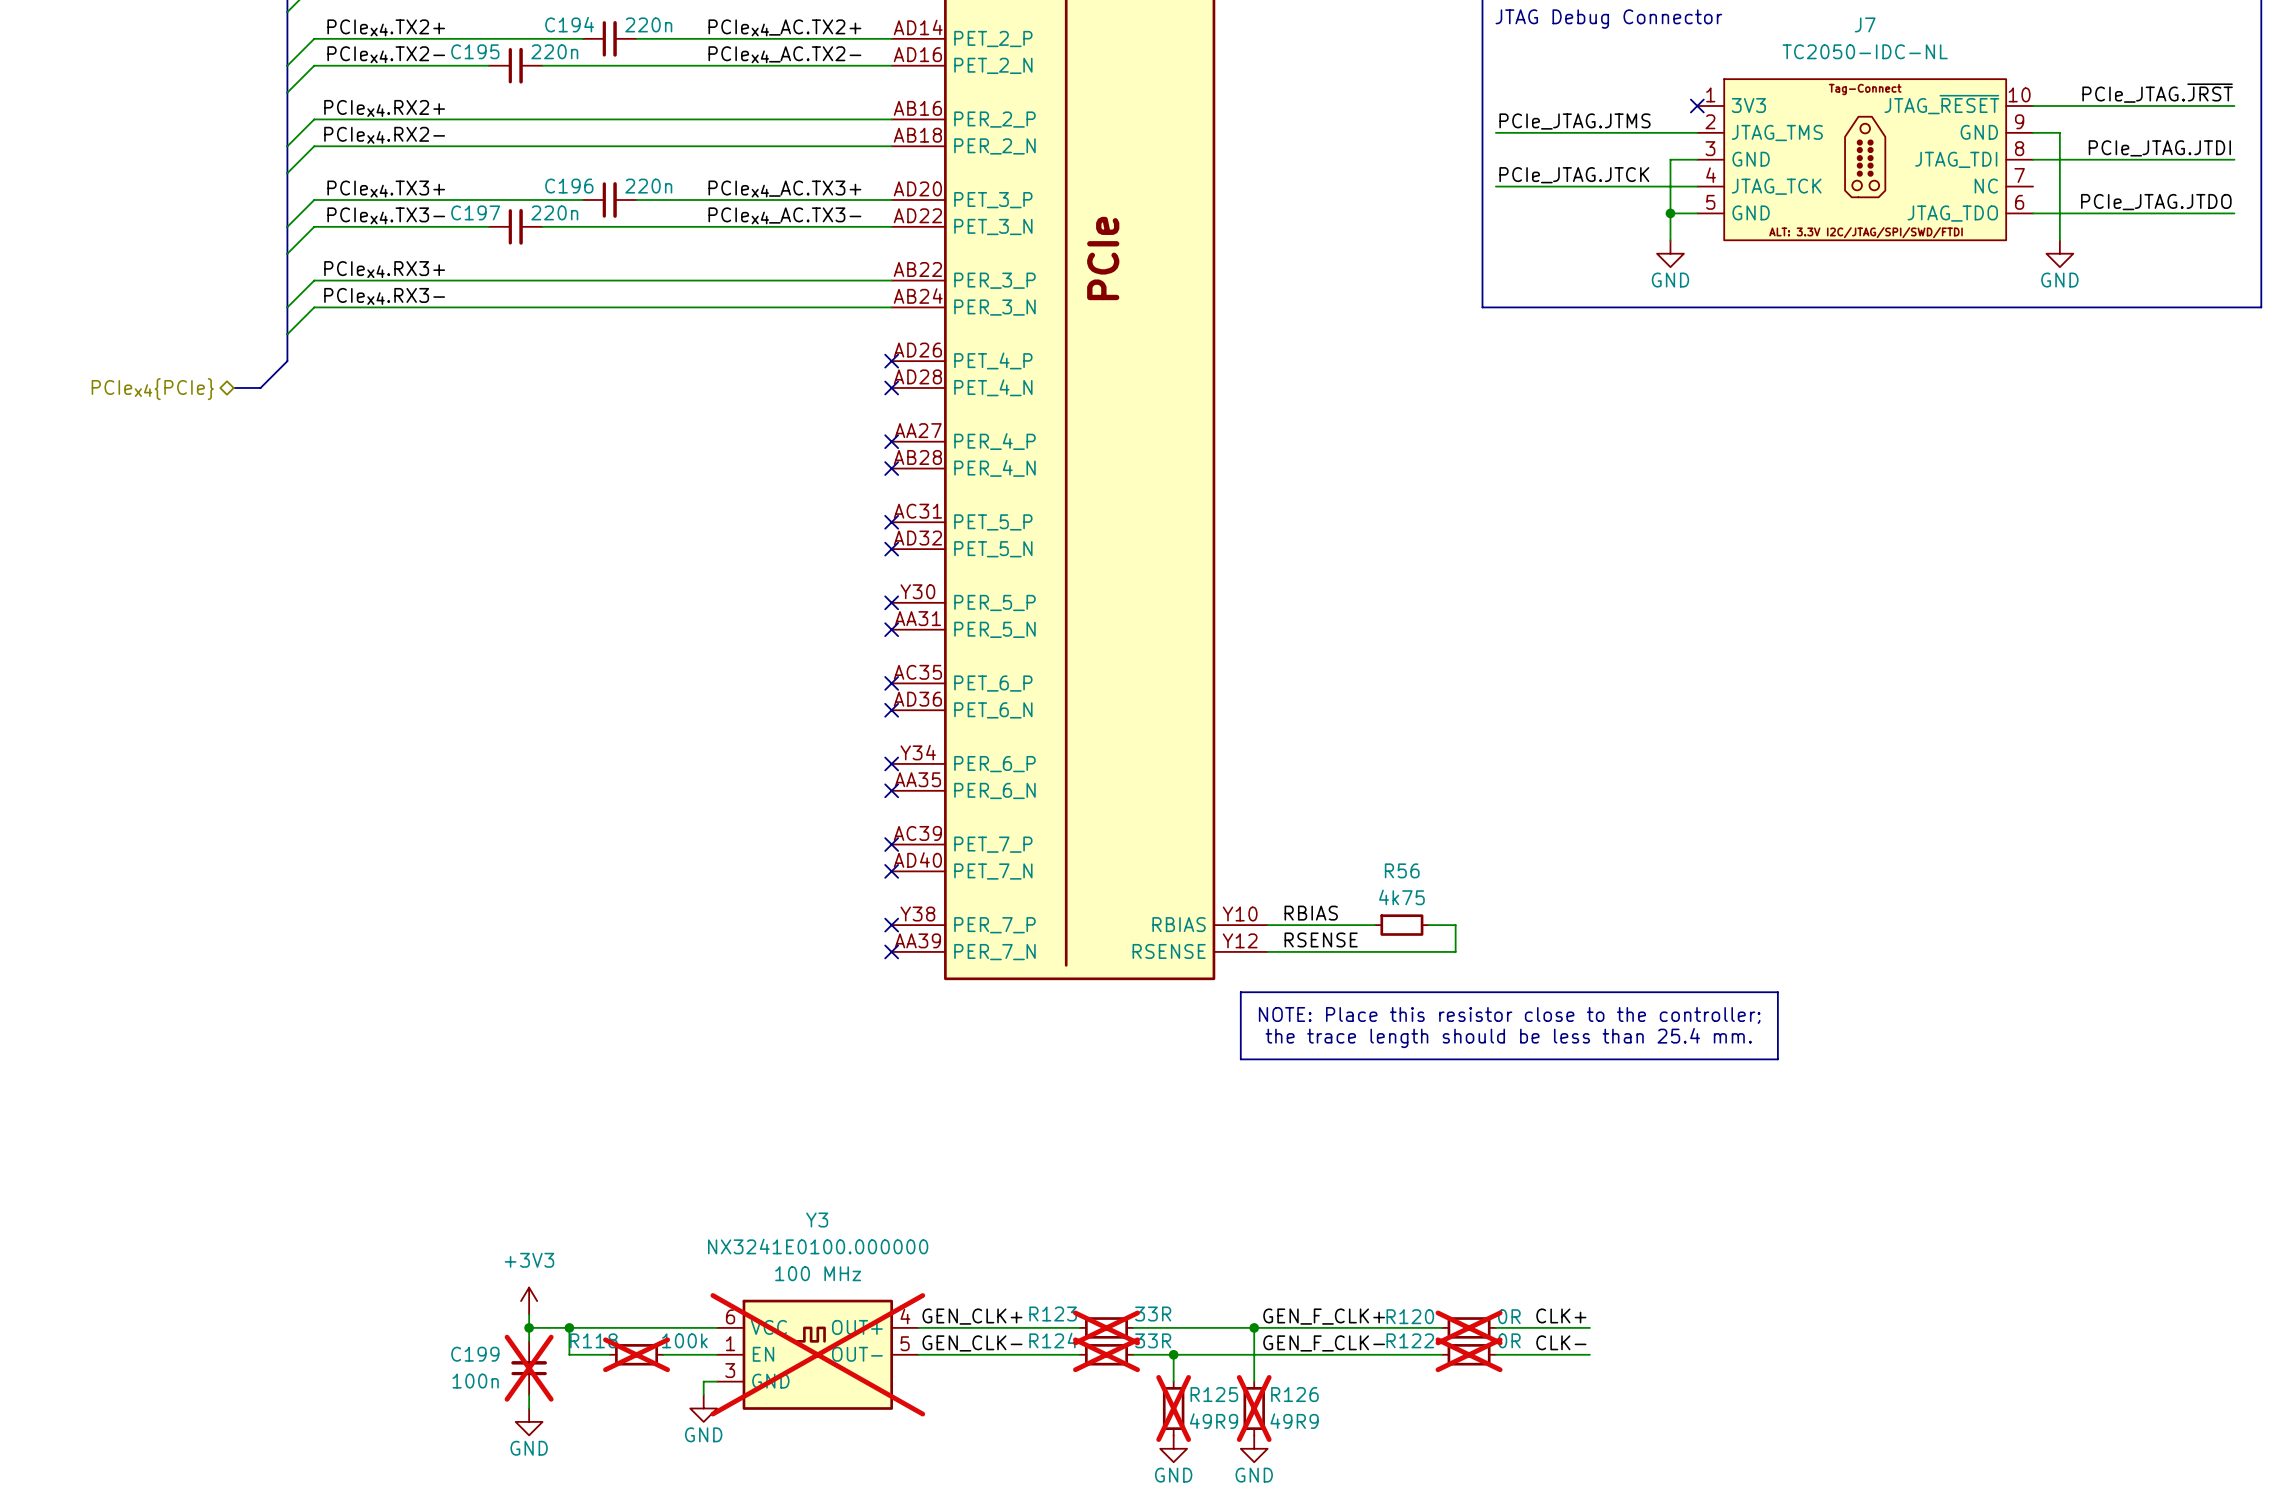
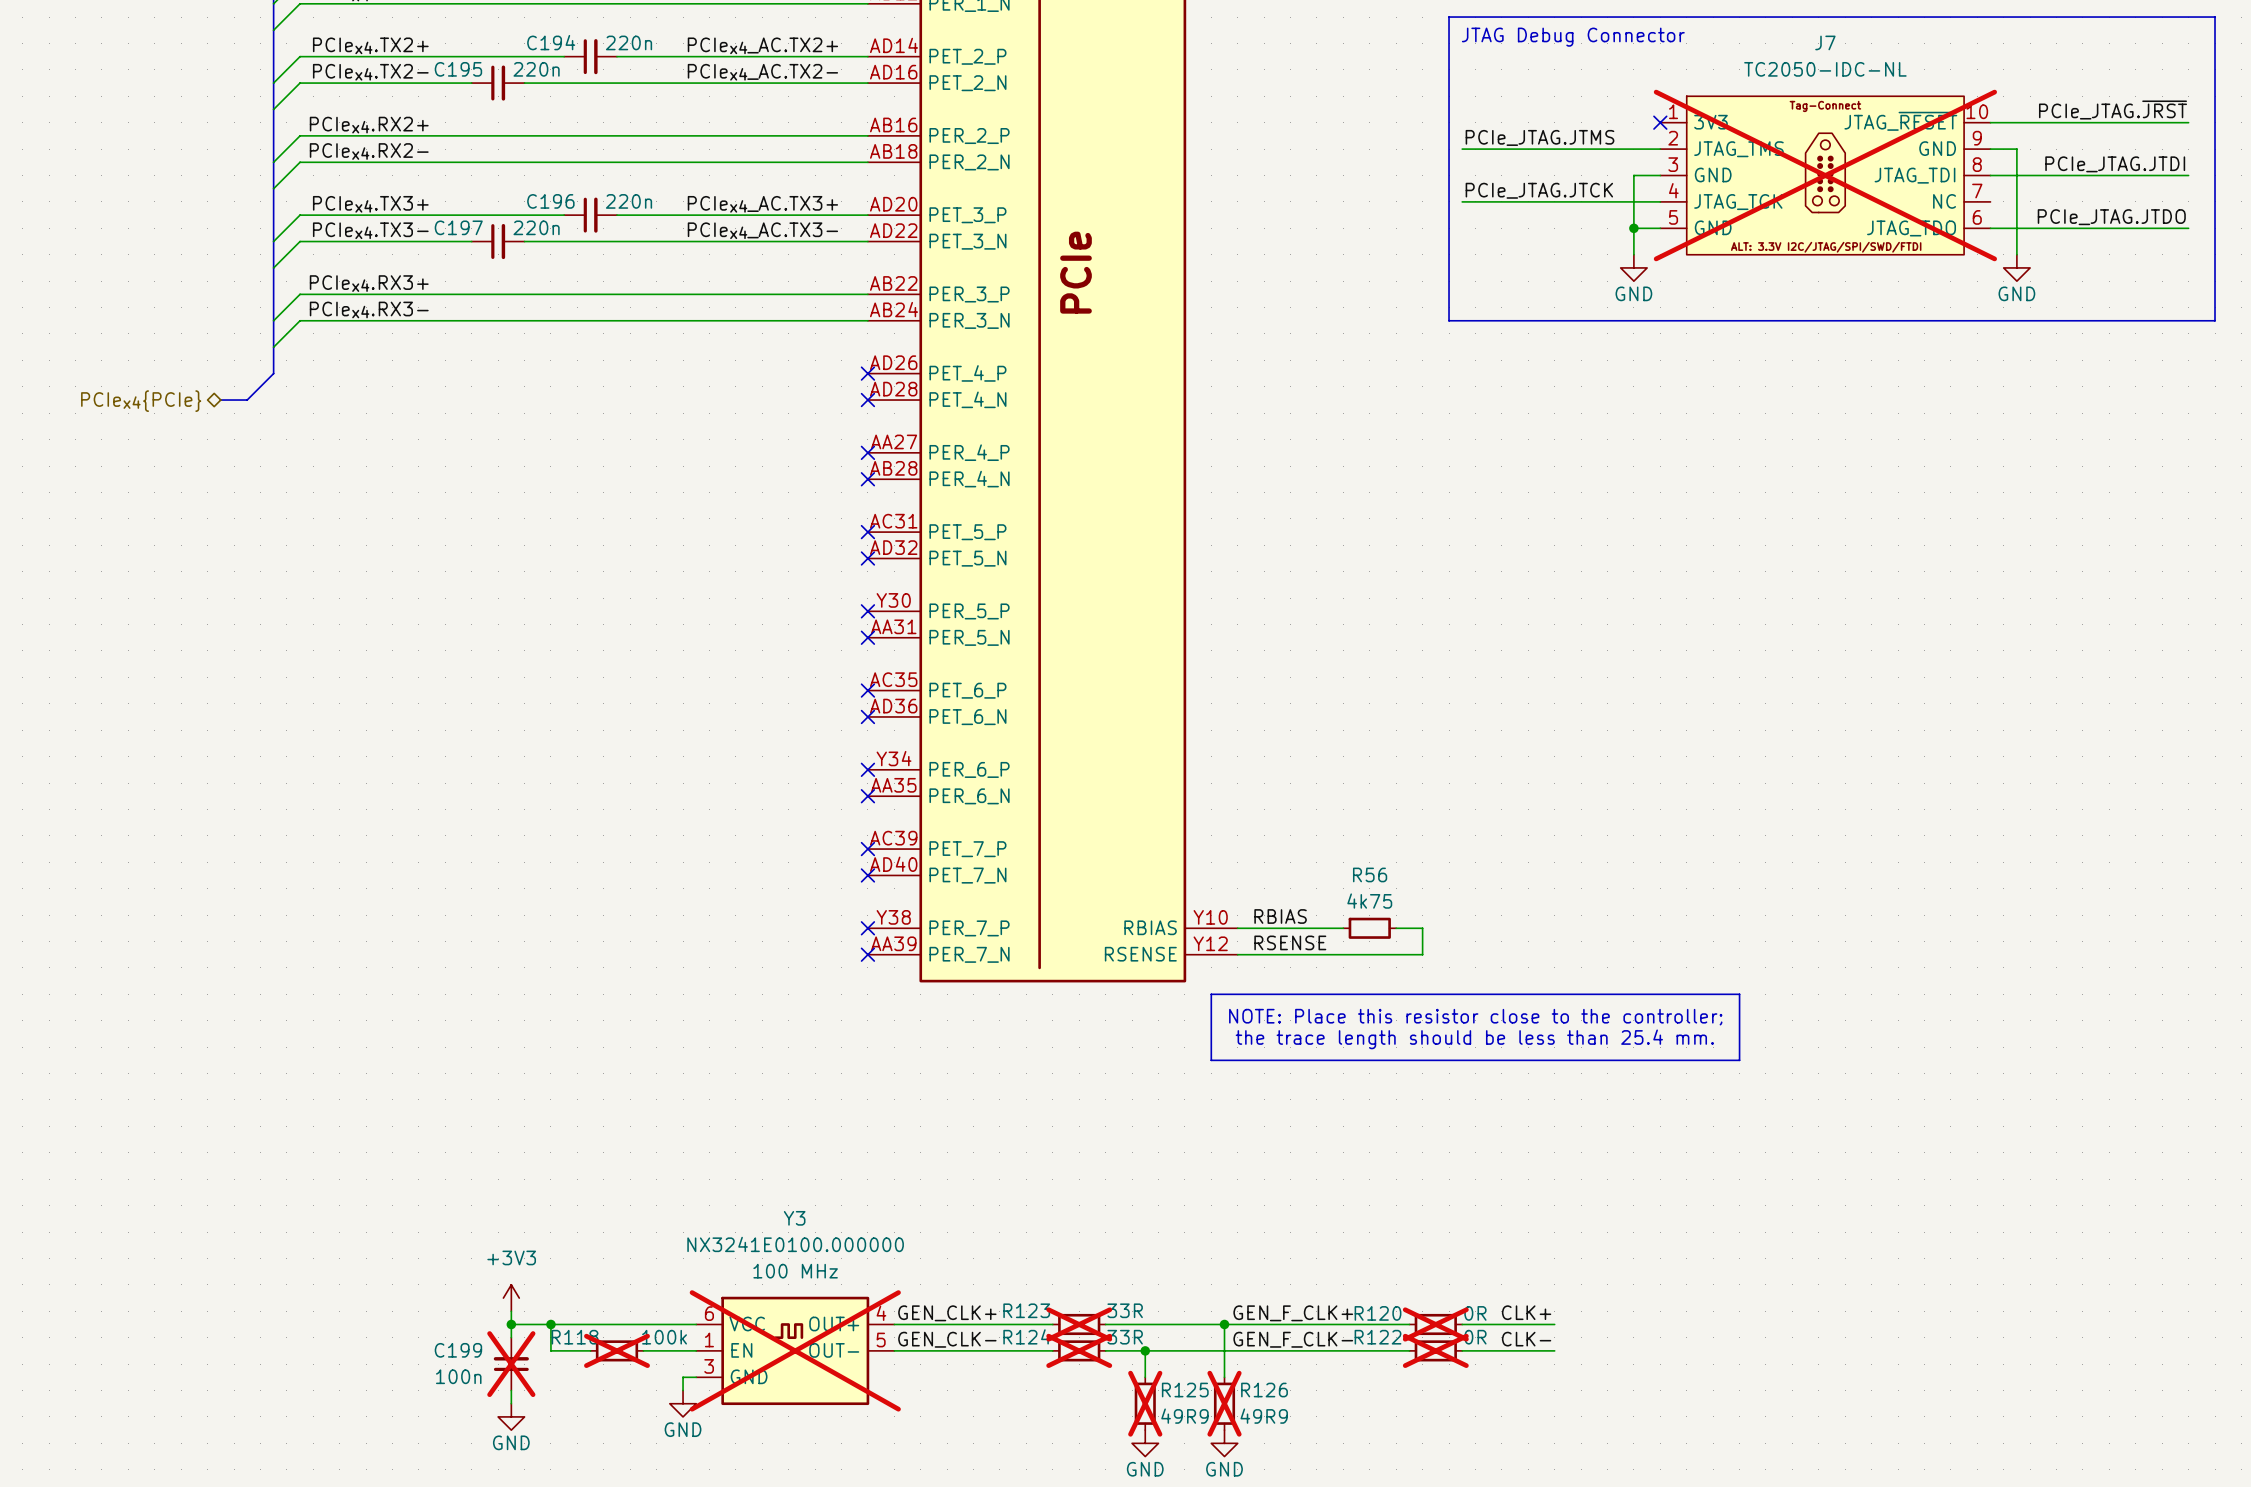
J7 do-not-place cross: none -> (1825, 175)

